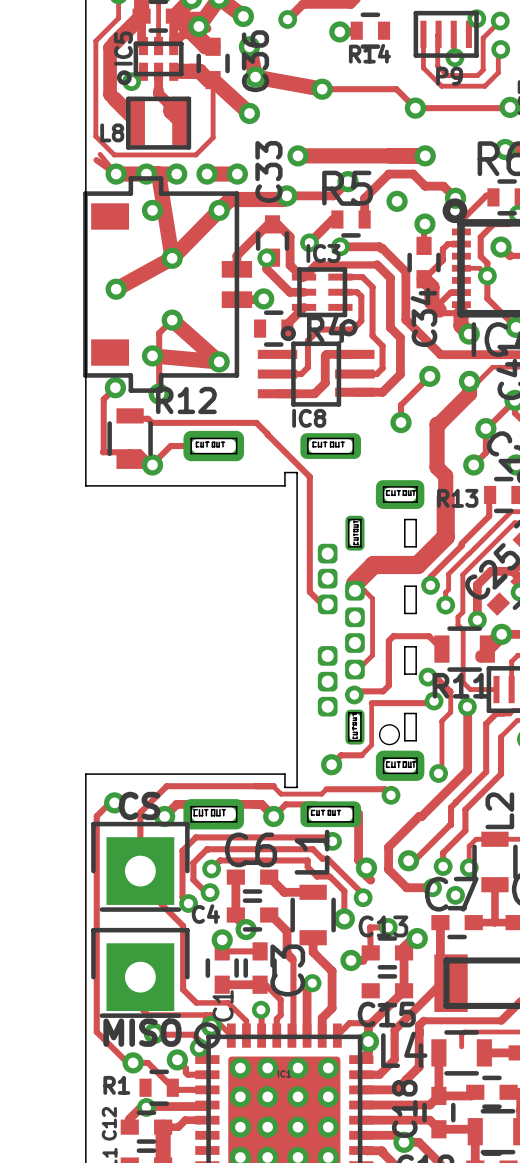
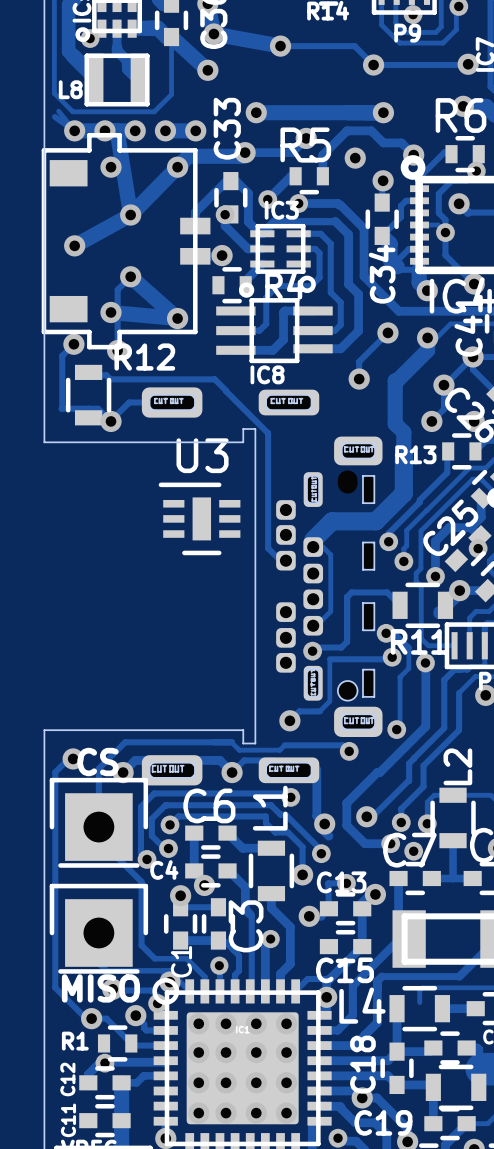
U3: none -> (199, 518)

